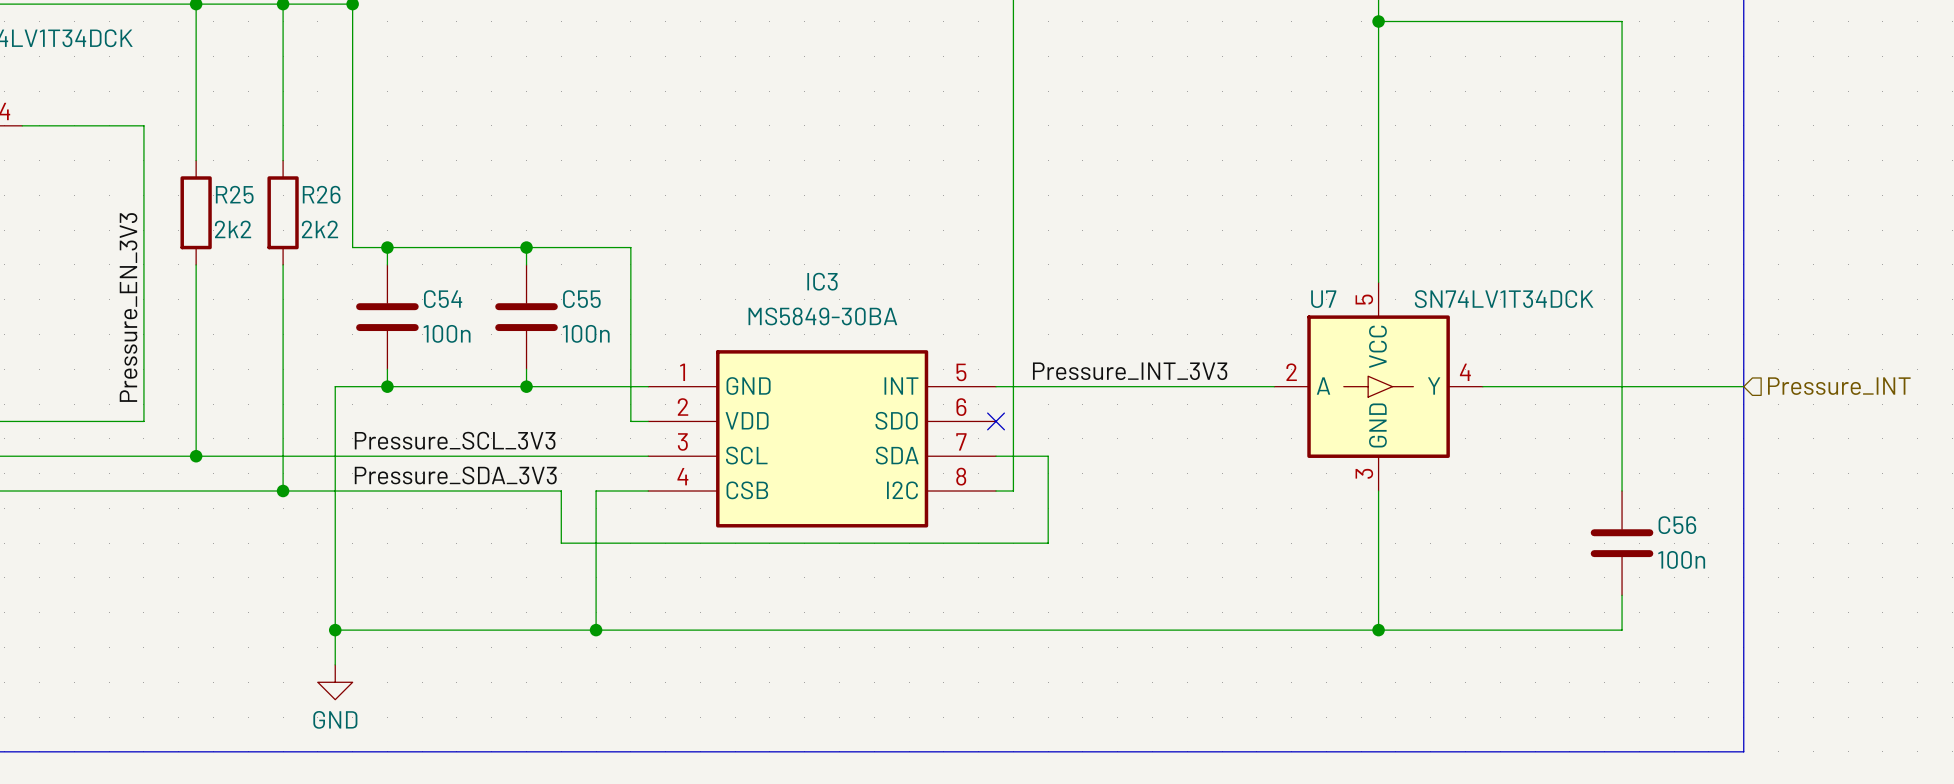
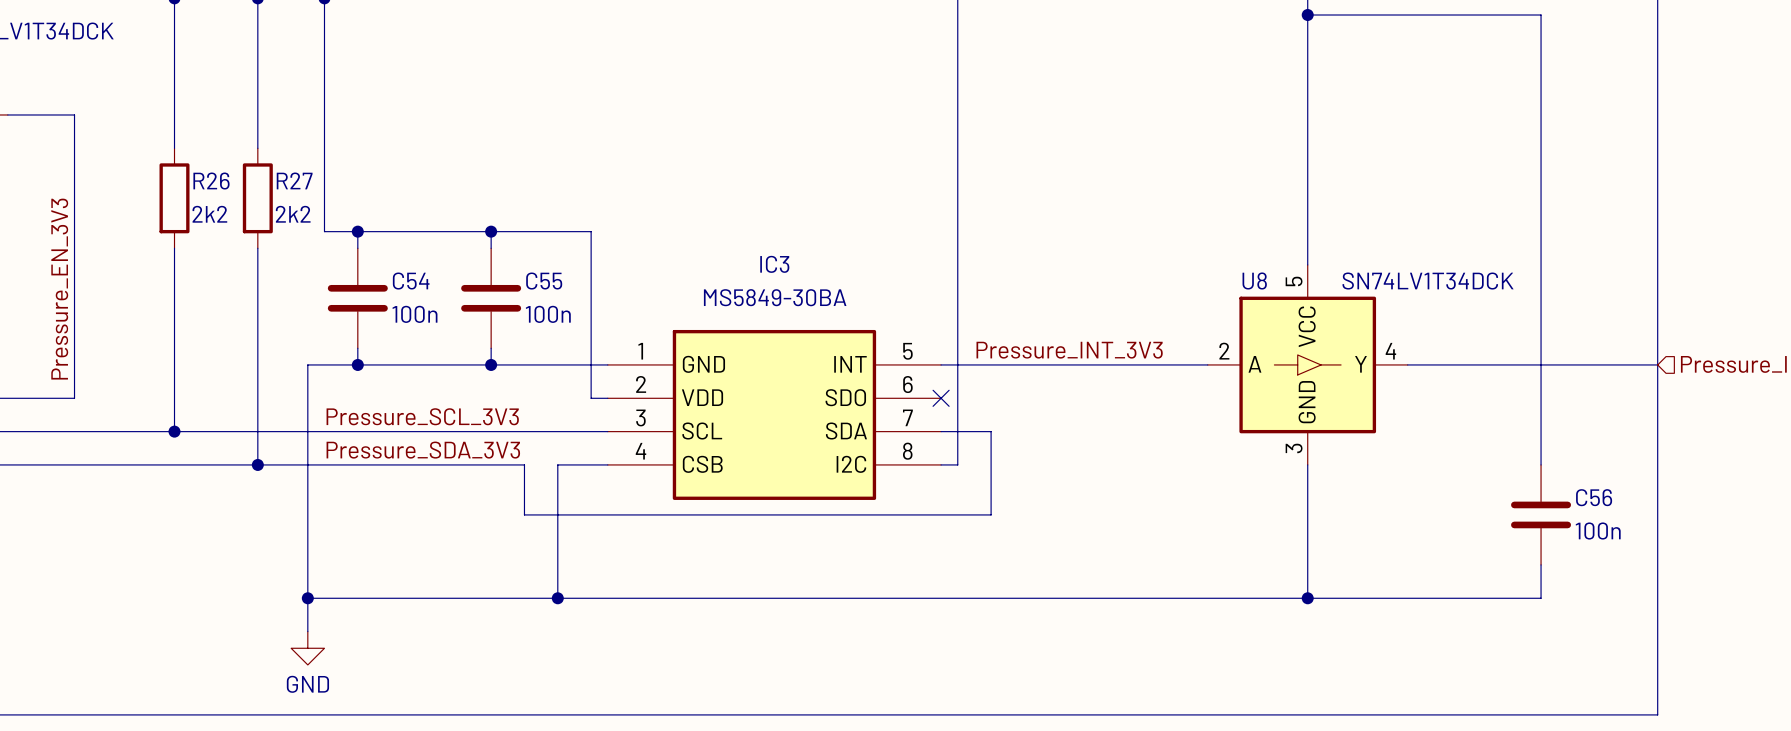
wire: (91, 125) (143, 125) (143, 421) (91, 421) -> (74, 114) (74, 398)
R25 name: R25 (234, 194) -> R26 (211, 181)
R26 name: R26 (321, 194) -> R27 (294, 180)
U7 name: U7 (1323, 299) -> U8 (1254, 280)
label position: Pressure_EN_3V3 (128, 307) -> Pressure_EN_3V3 (59, 289)

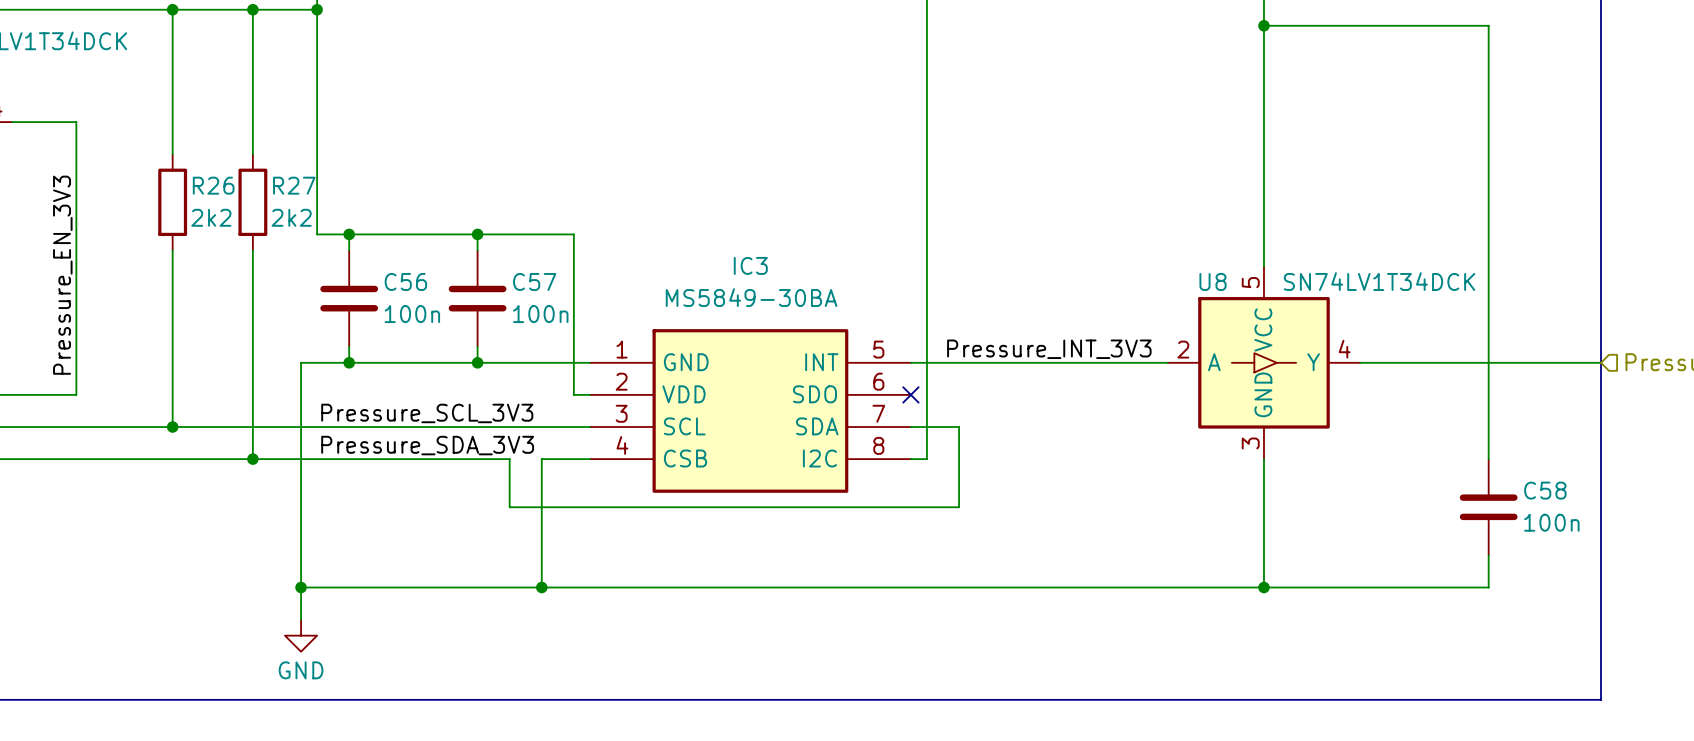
C54 name: C54 (411, 281) -> C56 (405, 281)
C55 name: C55 (544, 281) -> C57 (534, 281)
C56 name: C56 (1594, 497) -> C58 (1545, 490)

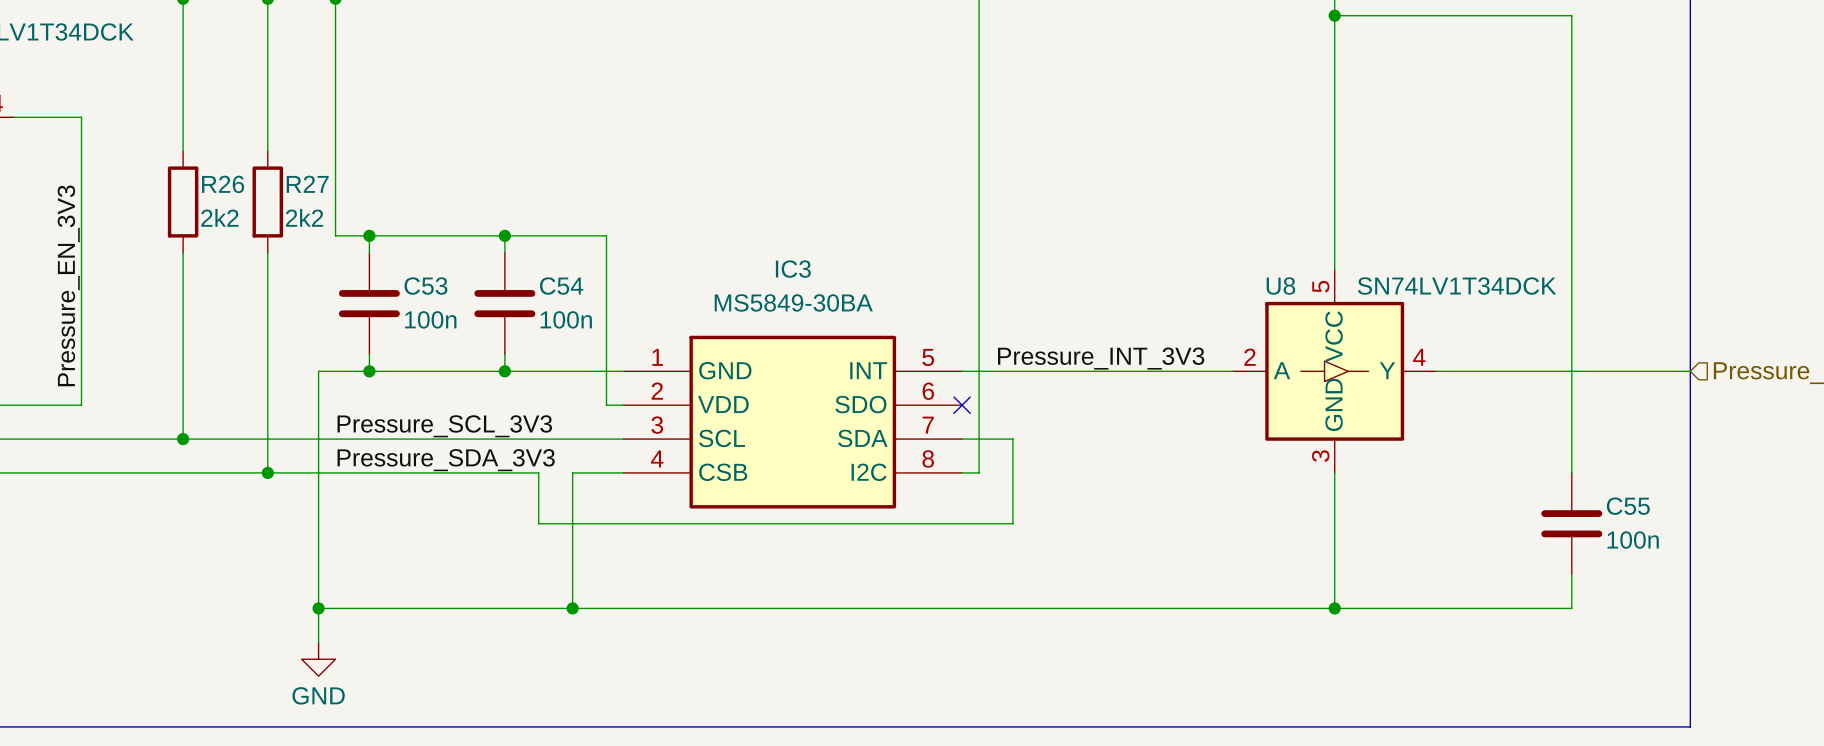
C56 name: C56 (405, 281) -> C53 (425, 286)
C57 name: C57 (534, 281) -> C54 (561, 286)
C58 name: C58 (1545, 490) -> C55 (1628, 506)

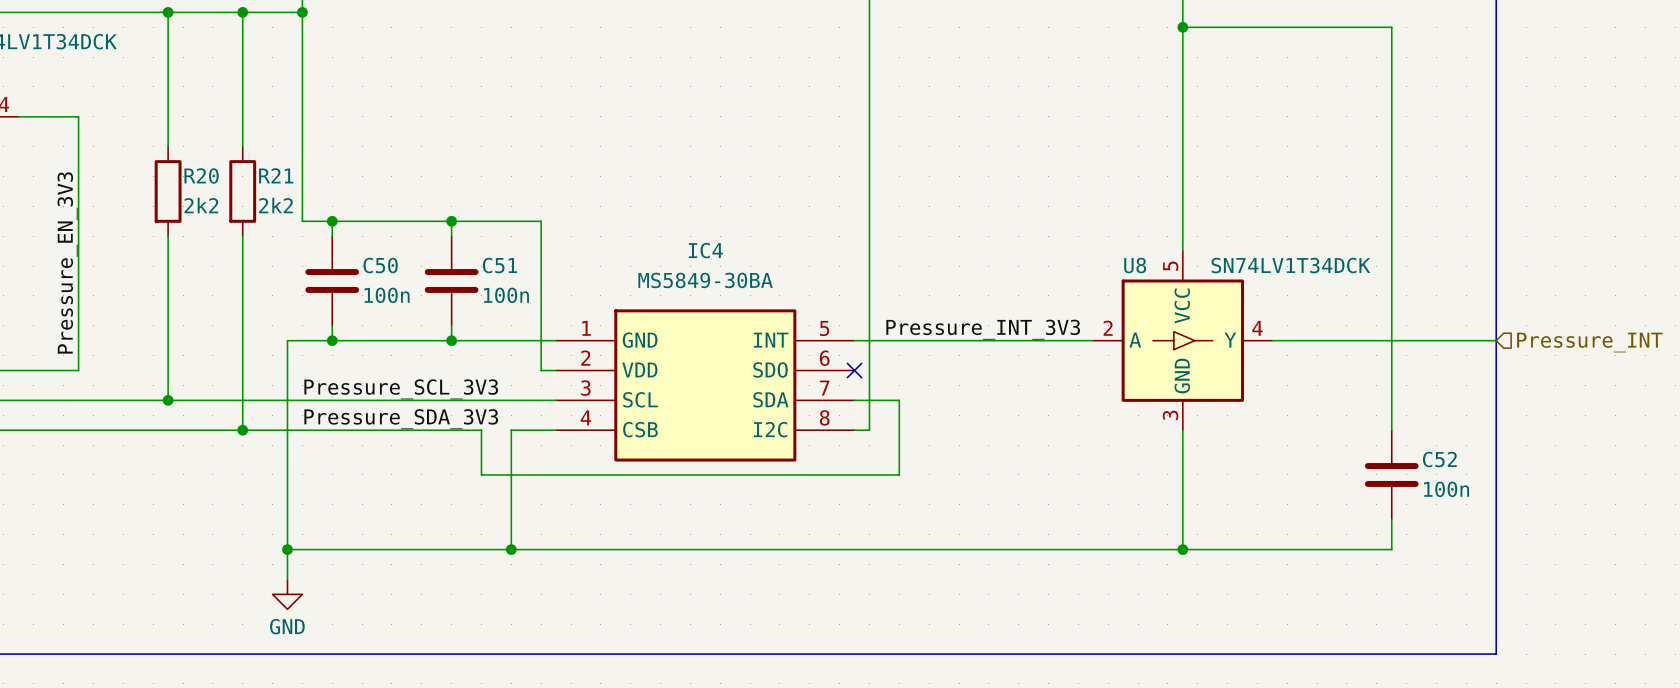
R26 name: R26 (223, 184) -> R20 (201, 175)
R27 name: R27 (307, 184) -> R21 (276, 175)
IC3 name: IC3 (793, 269) -> IC4 (705, 250)
C53 name: C53 (425, 286) -> C50 (380, 265)
C54 name: C54 (561, 286) -> C51 (499, 265)
C55 name: C55 (1628, 506) -> C52 (1439, 459)

